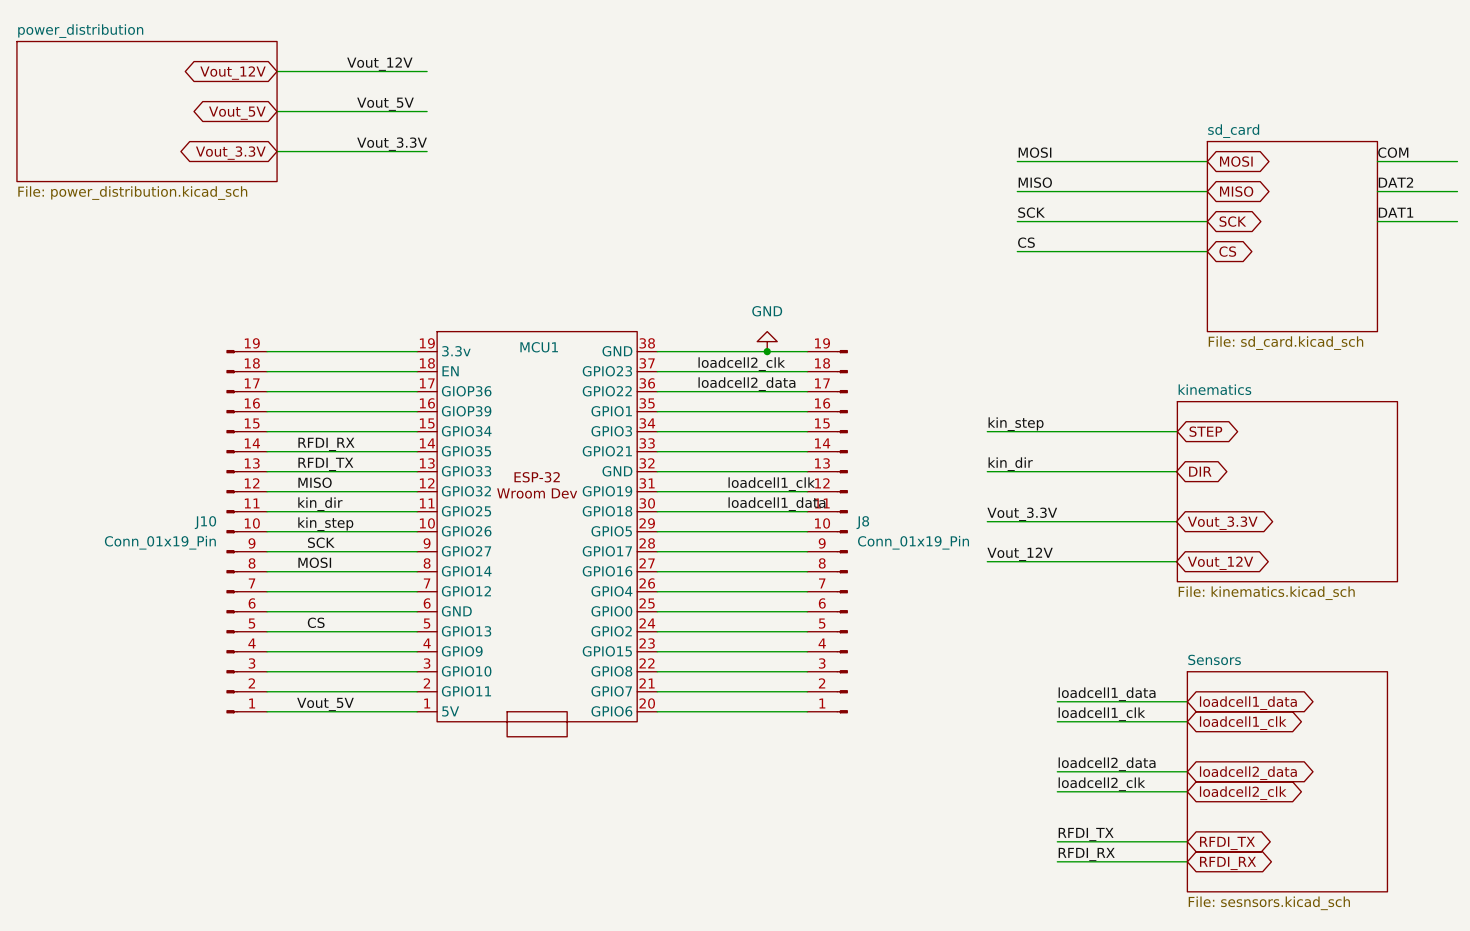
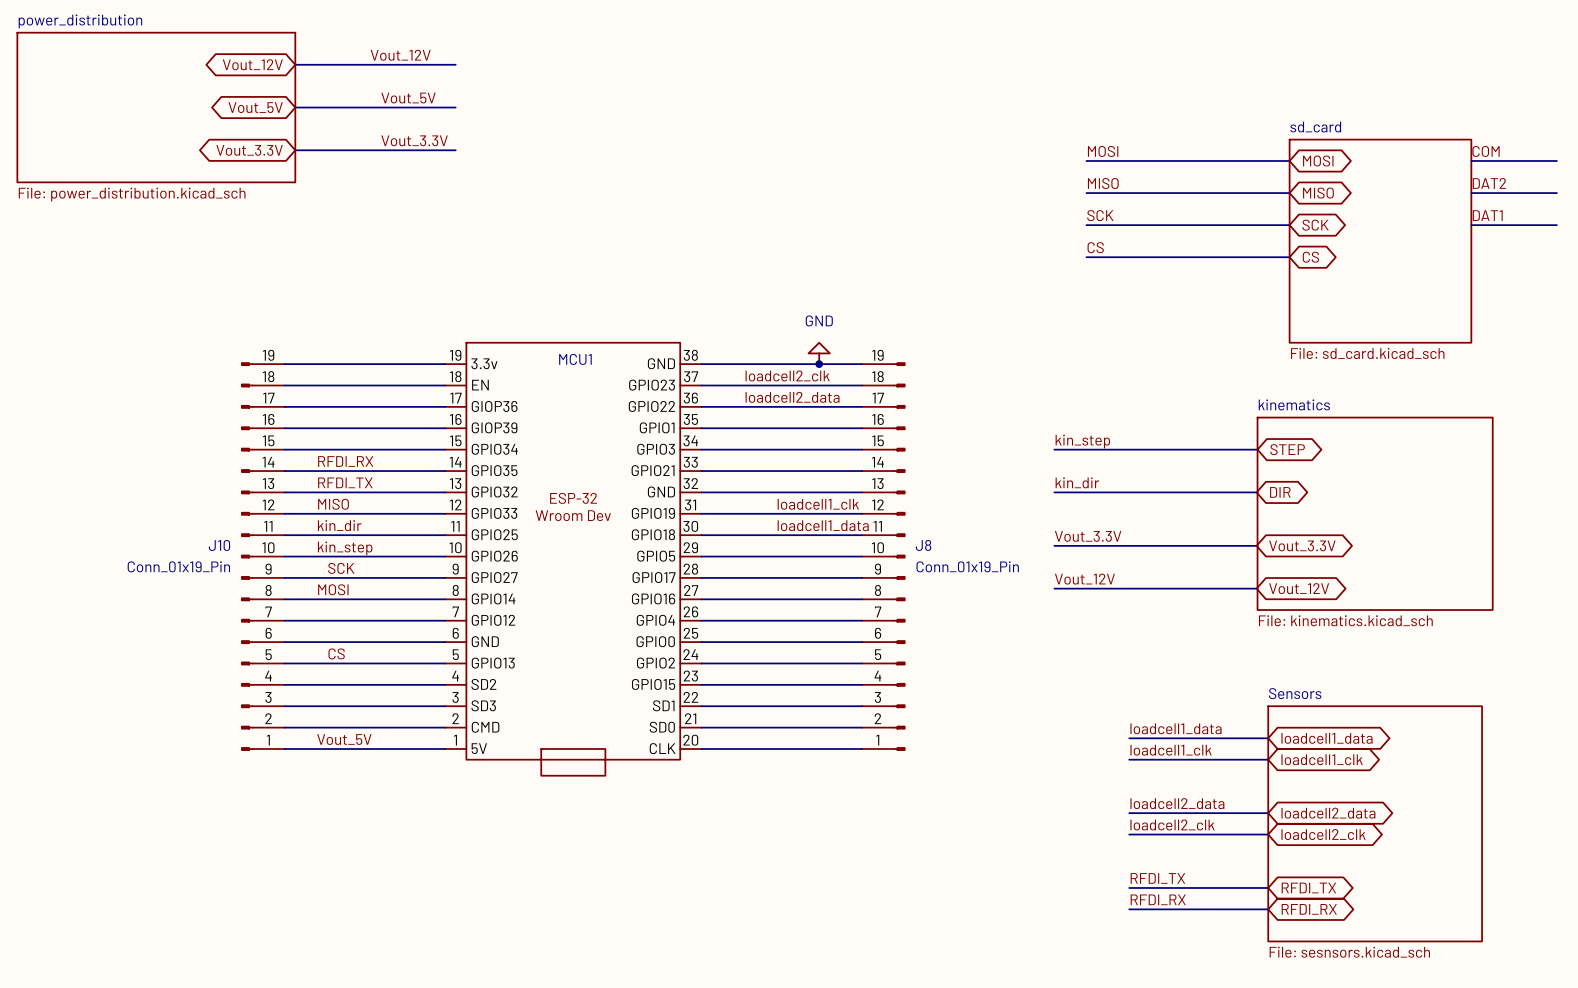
MCU1 pin name: GPIO33 (466, 471) -> GPIO32 (494, 492)
MCU1 pin name: GPIO32 (466, 491) -> GPIO33 (494, 513)
MCU1 pin name: GPIO9 (462, 651) -> SD2 (483, 684)
MCU1 pin name: GPIO10 (466, 671) -> SD3 (483, 705)
MCU1 pin name: GPIO8 (611, 671) -> SD1 (663, 705)
MCU1 pin name: GPIO11 (466, 691) -> CMD (485, 727)
MCU1 pin name: GPIO7 (611, 691) -> SD0 (662, 727)
MCU1 pin name: GPIO6 (611, 711) -> CLK (662, 748)

